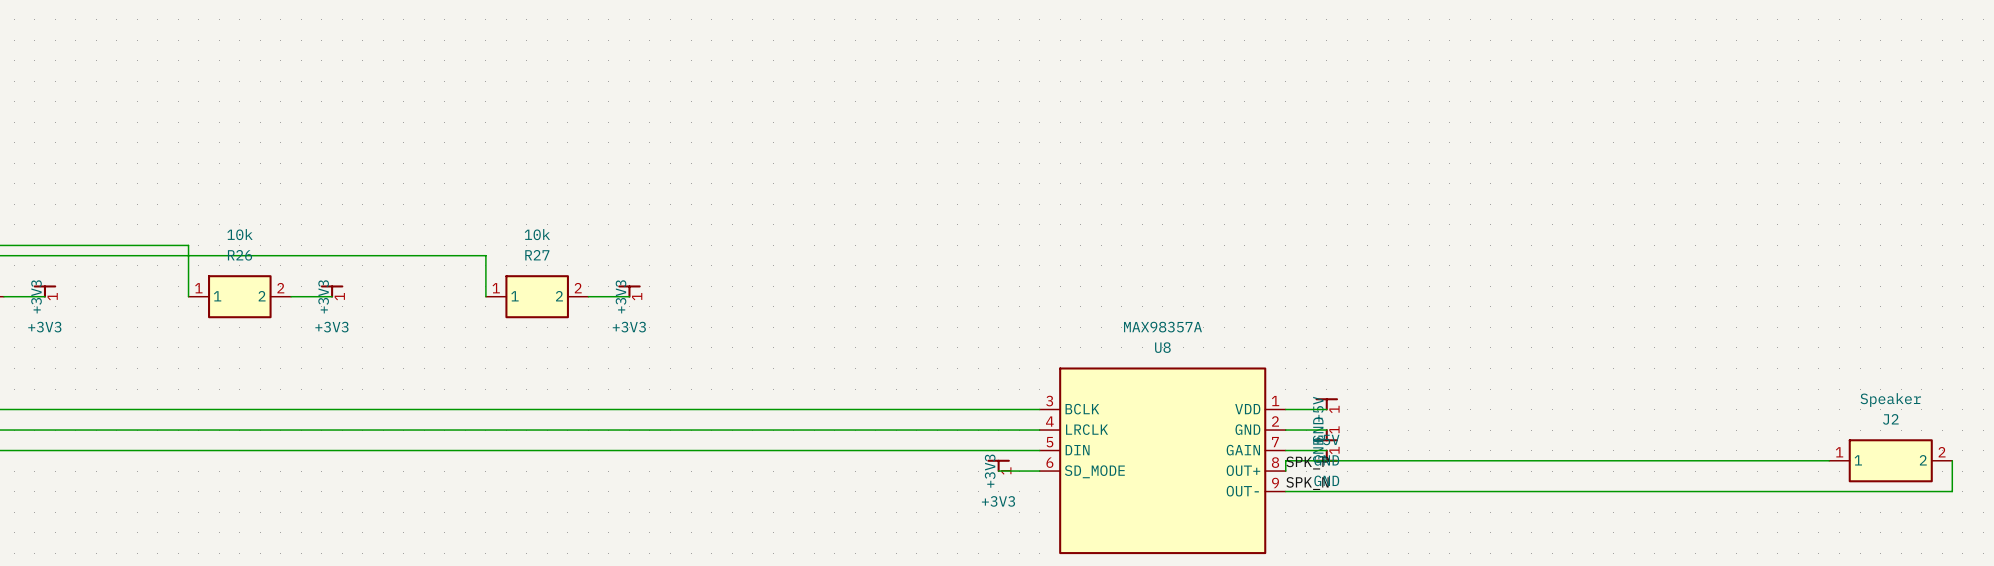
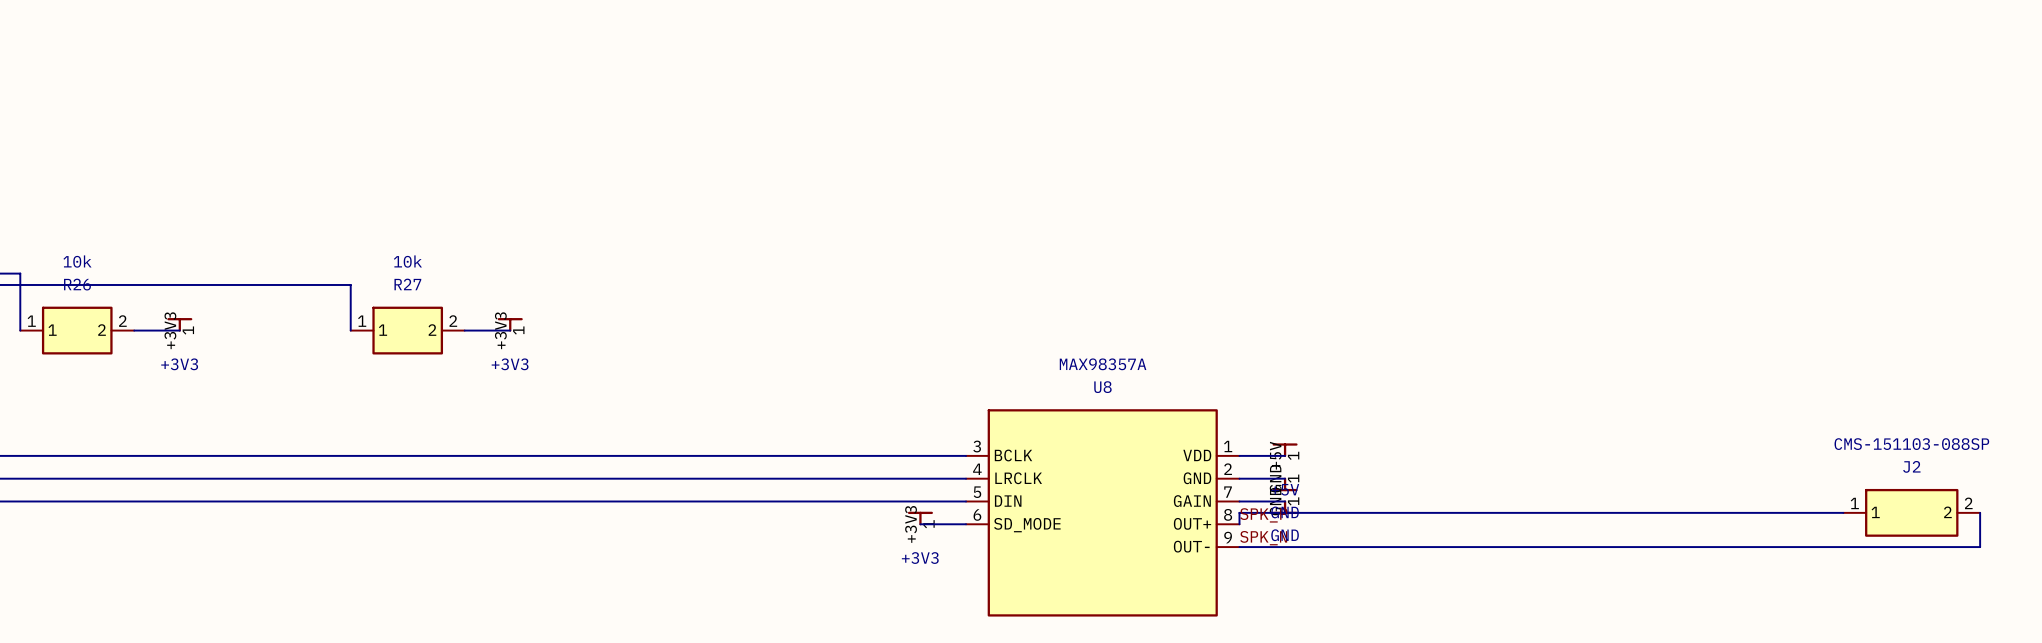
J2 value: Speaker (1890, 400) -> CMS-151103-088SP (1911, 444)

